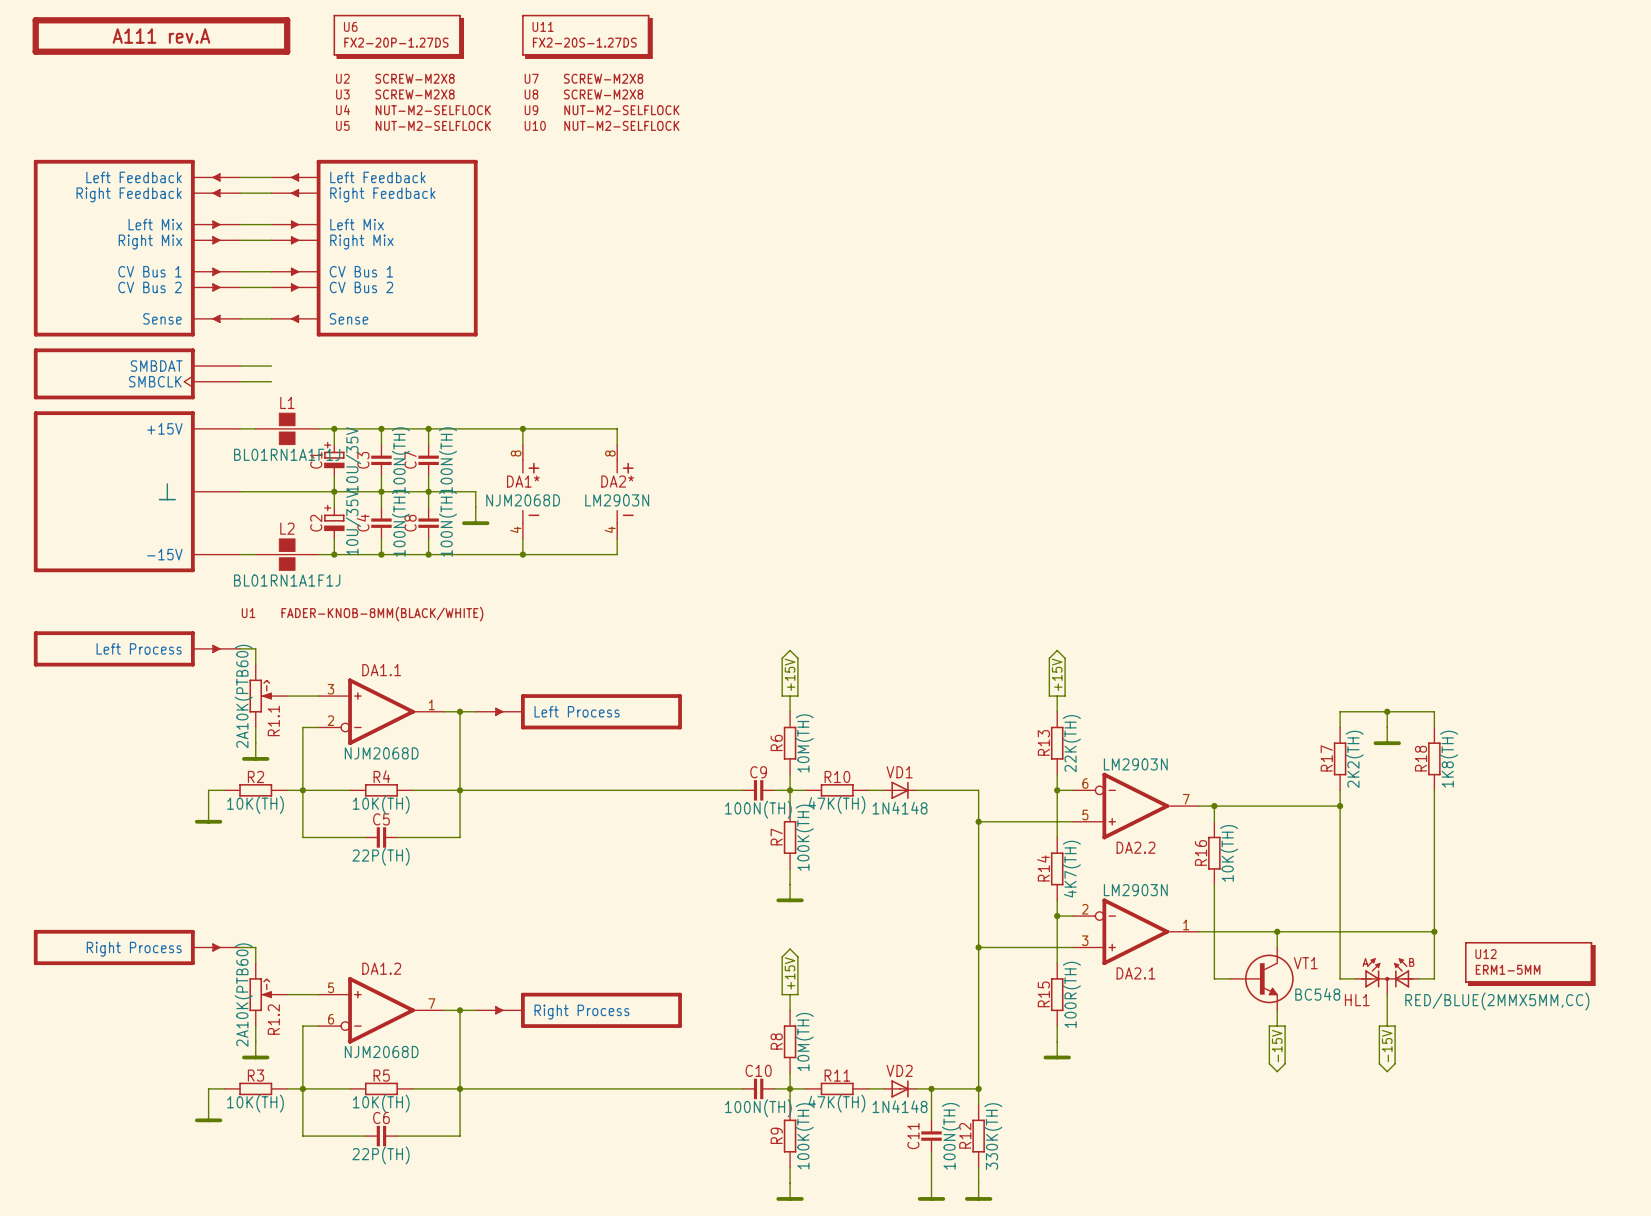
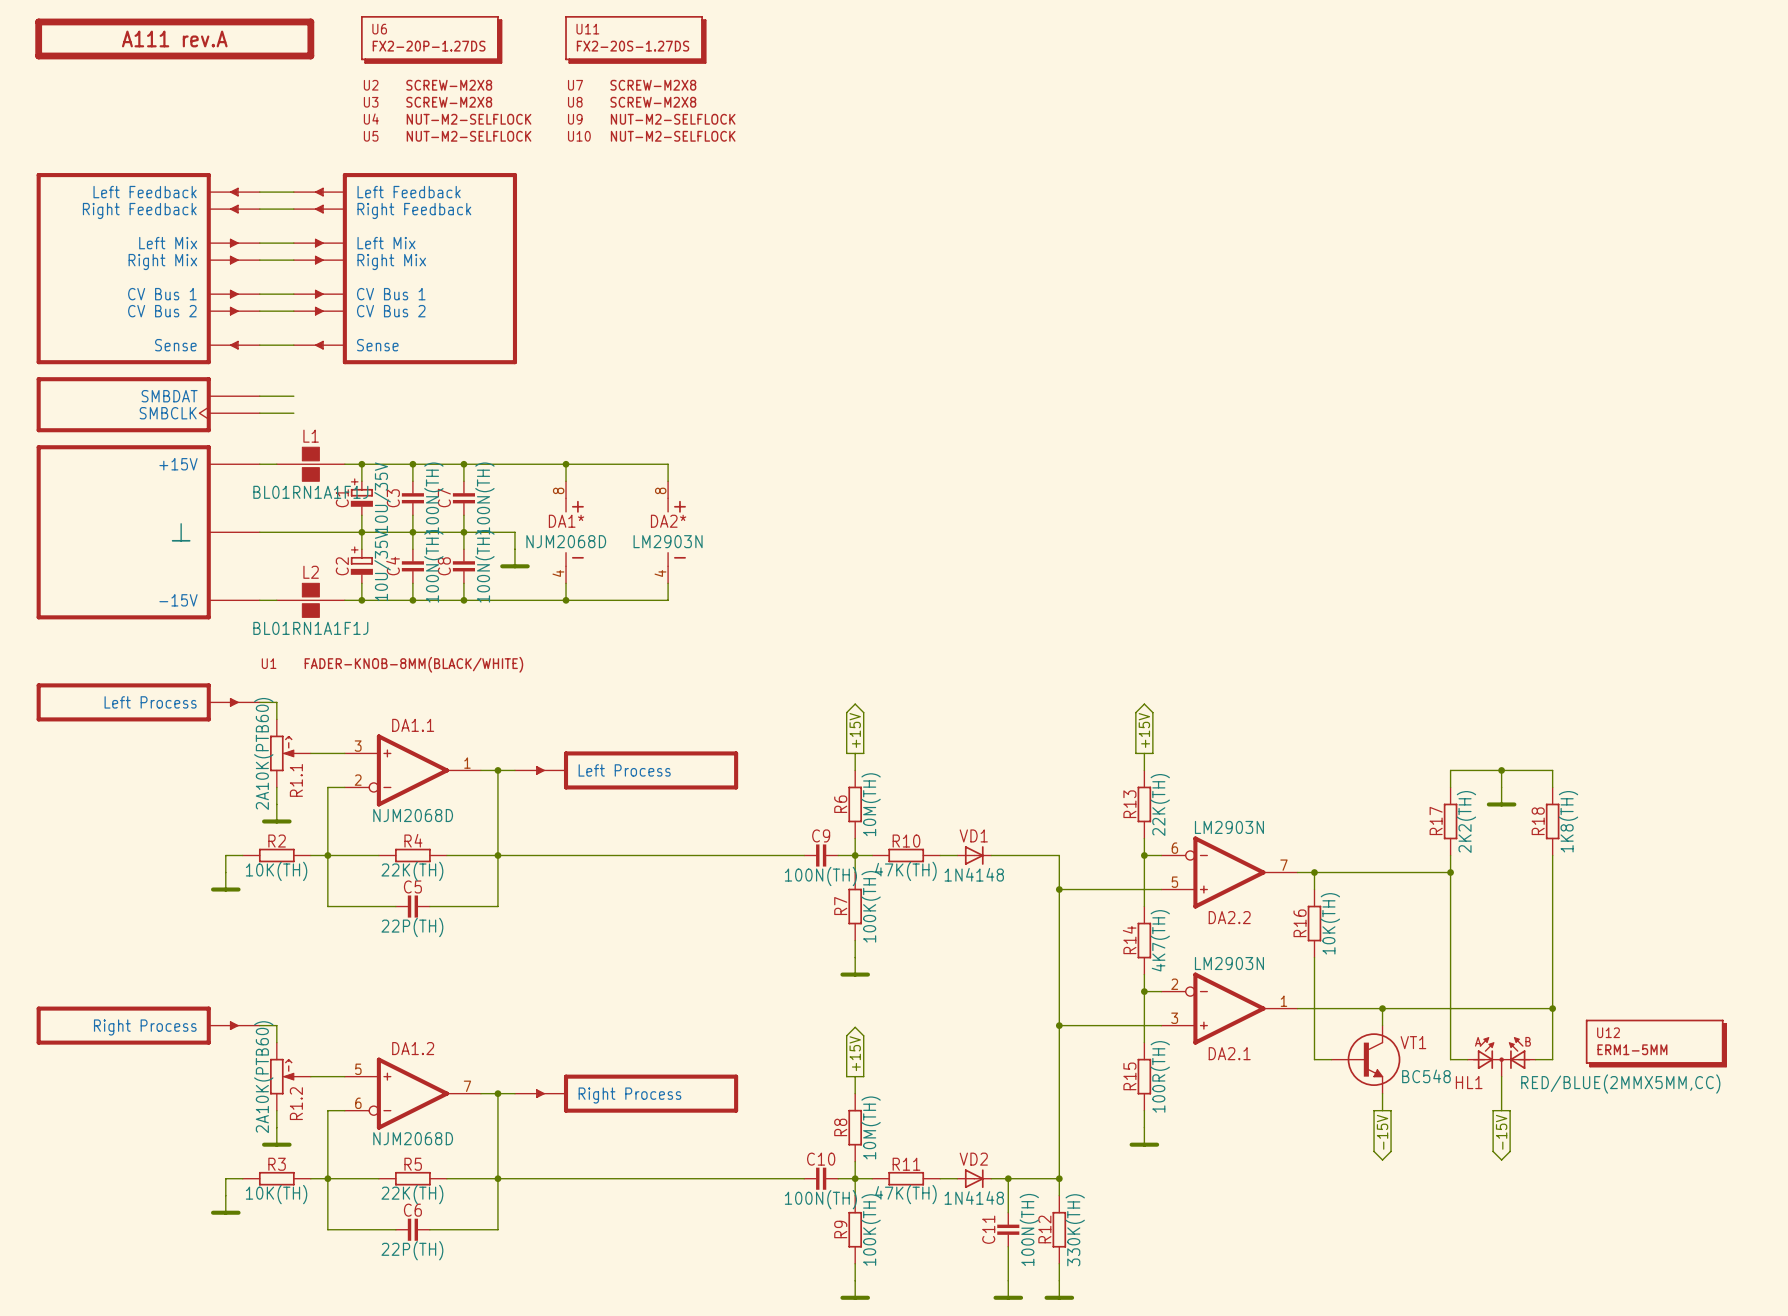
R4 value: 10K(TH) (381, 805) -> 22K(TH) (412, 871)
R5 value: 10K(TH) (381, 1103) -> 22K(TH) (412, 1194)

